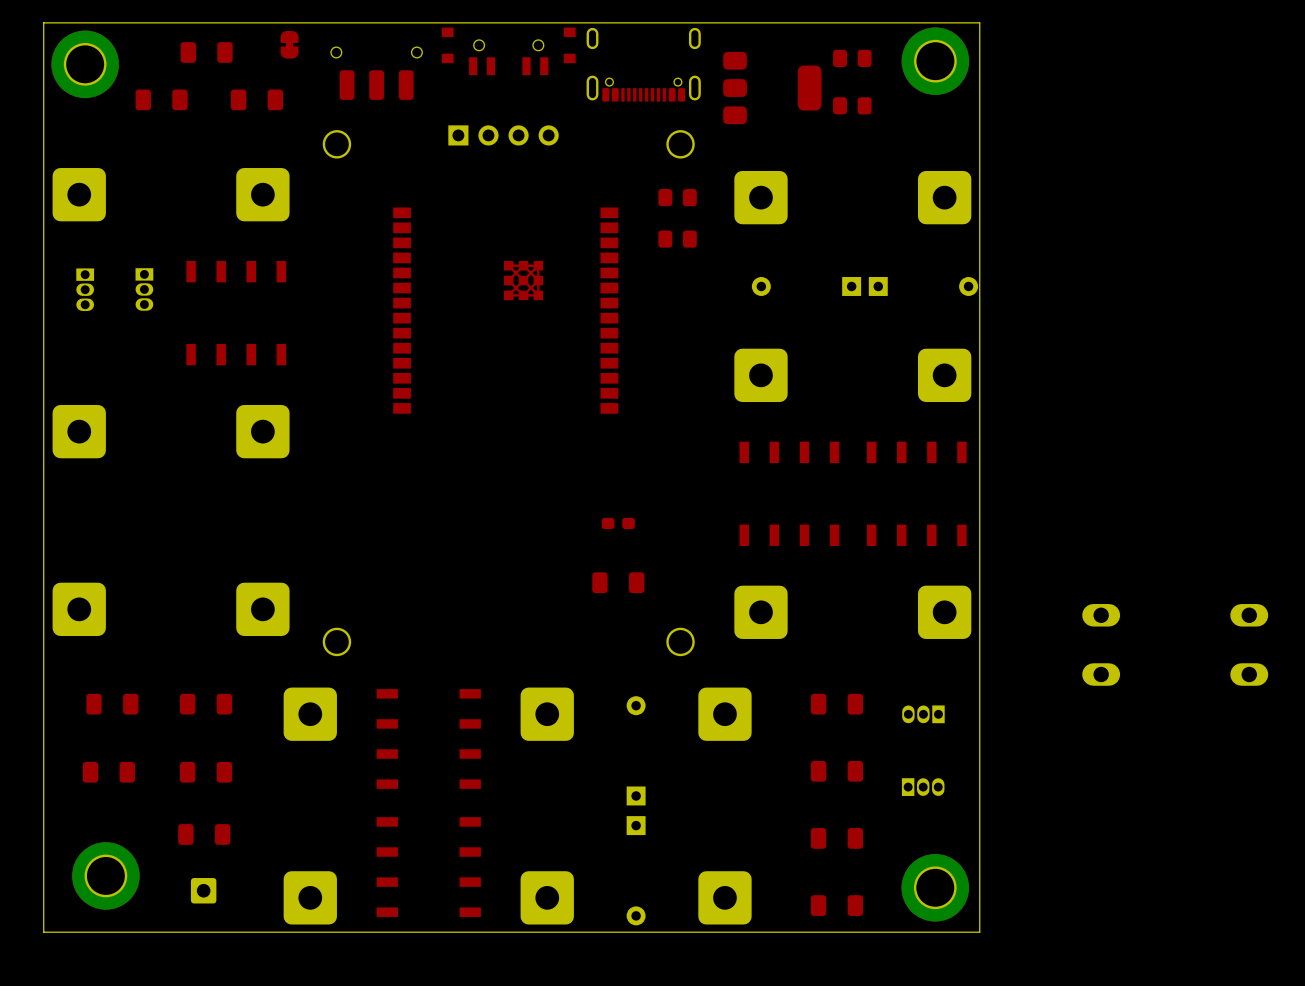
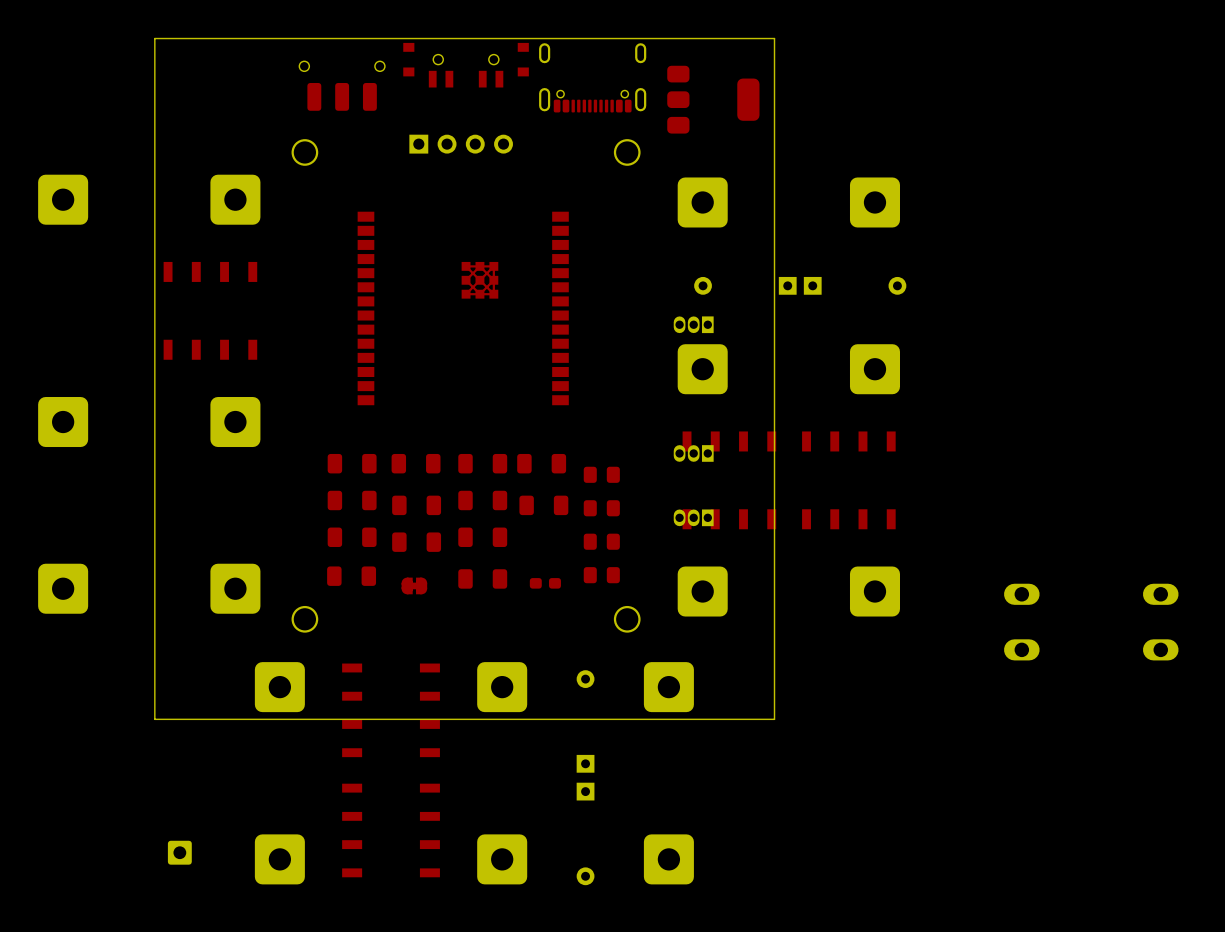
board edge: (837, 22) (979, 22) (979, 932) (43, 932) (43, 22) (176, 22) -> (774, 38) (774, 719) (154, 719) (154, 38)
part: (289, 44) -> none
part: (206, 52) -> none
part: (852, 58) -> none
part: (935, 61) -> none
part: (85, 64) -> none
part: (161, 99) -> none
part: (256, 99) -> none
part: (852, 105) -> none
part: (677, 197) -> none
part: (677, 239) -> none
part: (85, 289) -> none
part: (144, 289) -> none
part: none -> (693, 324)
part: none -> (693, 453)
part: none -> (352, 463)
part: none -> (416, 463)
part: none -> (482, 463)
part: none -> (541, 463)
part: none -> (601, 474)
part: none -> (352, 500)
part: none -> (482, 500)
part: none -> (416, 505)
part: none -> (543, 505)
part position: (618, 523) -> (545, 583)
part: none -> (601, 508)
part: none -> (693, 517)
part: none -> (352, 537)
part: none -> (482, 537)
part: none -> (416, 542)
part: none -> (601, 541)
part: (618, 582) -> none
part: none -> (601, 575)
part: none -> (351, 576)
part: none -> (482, 578)
part: none -> (414, 585)
part: (112, 704) -> none
part: (206, 704) -> none
part: (836, 704) -> none
part: (923, 714) -> none
part: (836, 771) -> none
part: (108, 772) -> none
part: (206, 772) -> none
part: (923, 787) -> none
part: (204, 834) -> none
part: (836, 838) -> none
part: (105, 875) -> none
part: (935, 887) -> none
part: (836, 905) -> none

